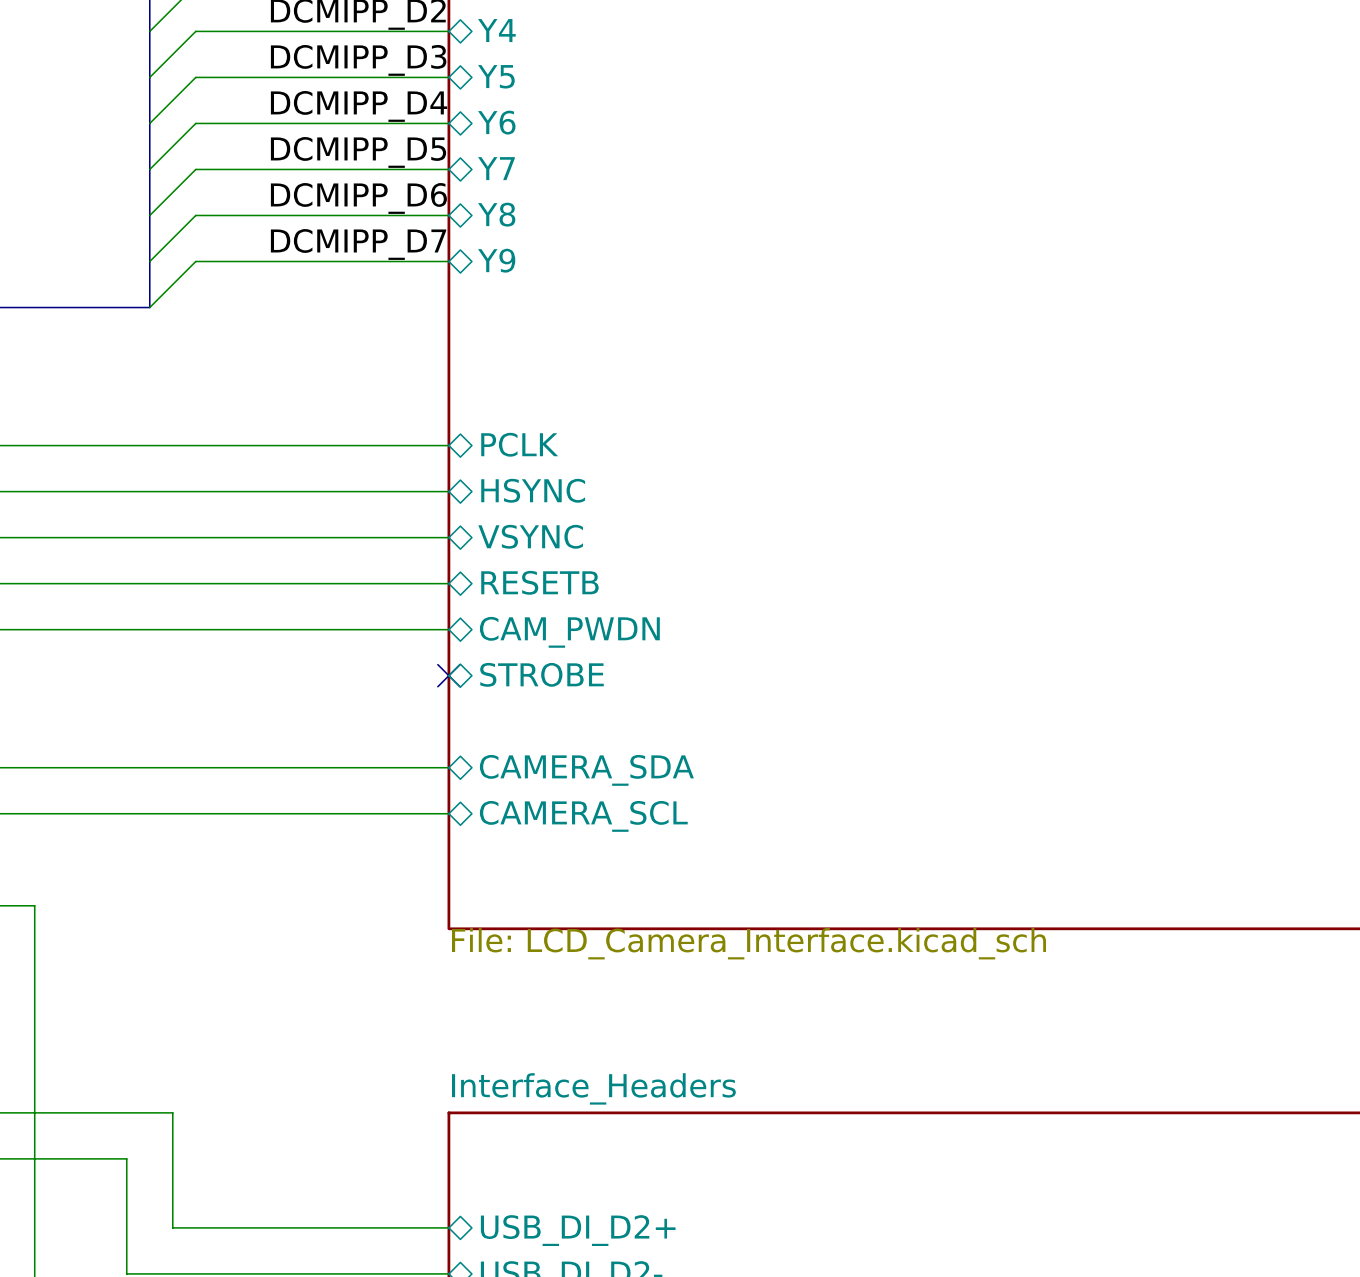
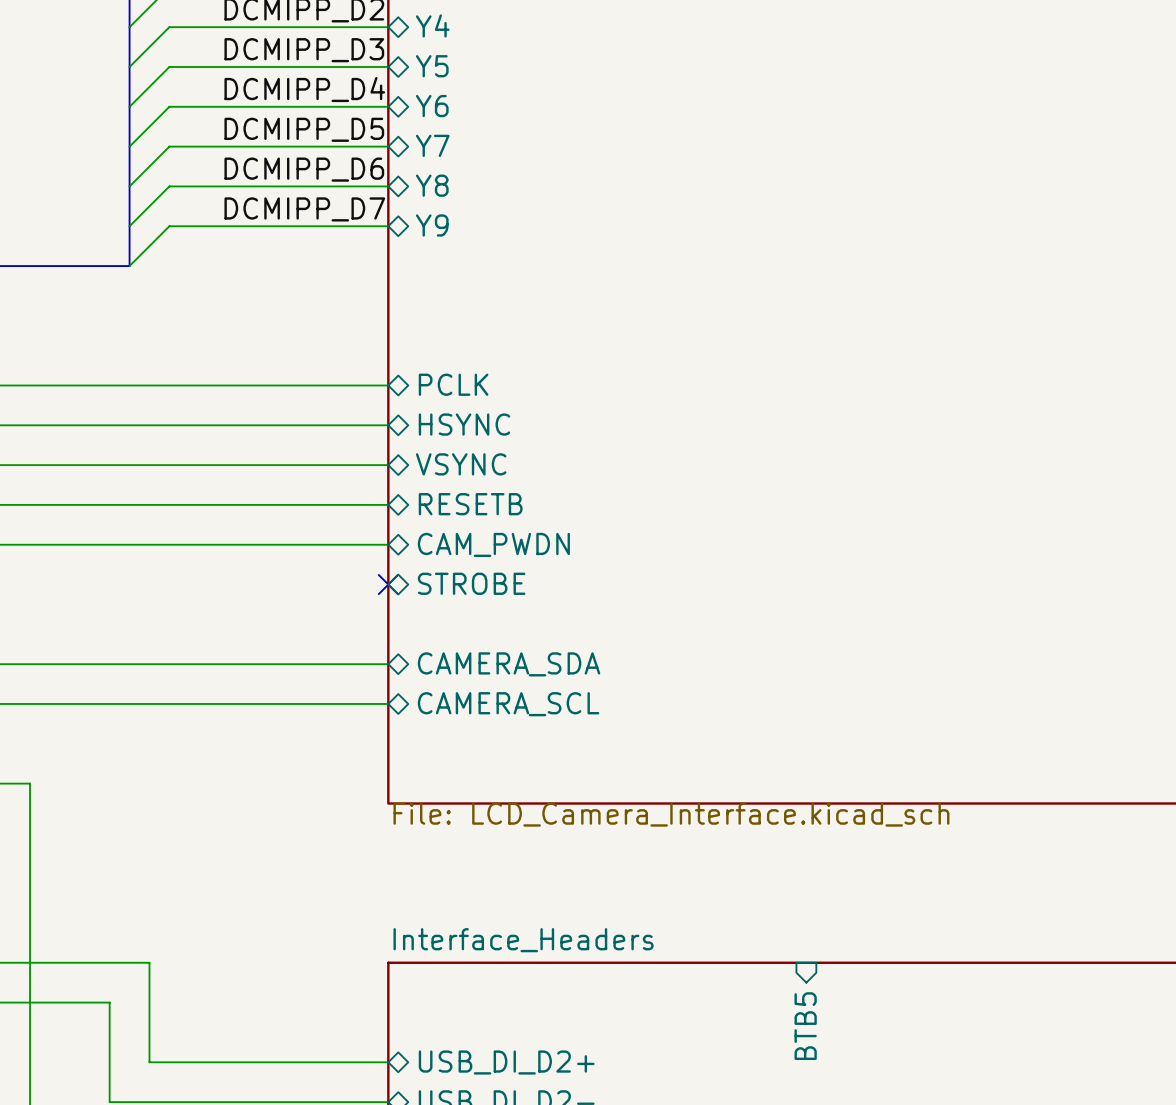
sheet pin: none -> BTB5 (805, 1026)

